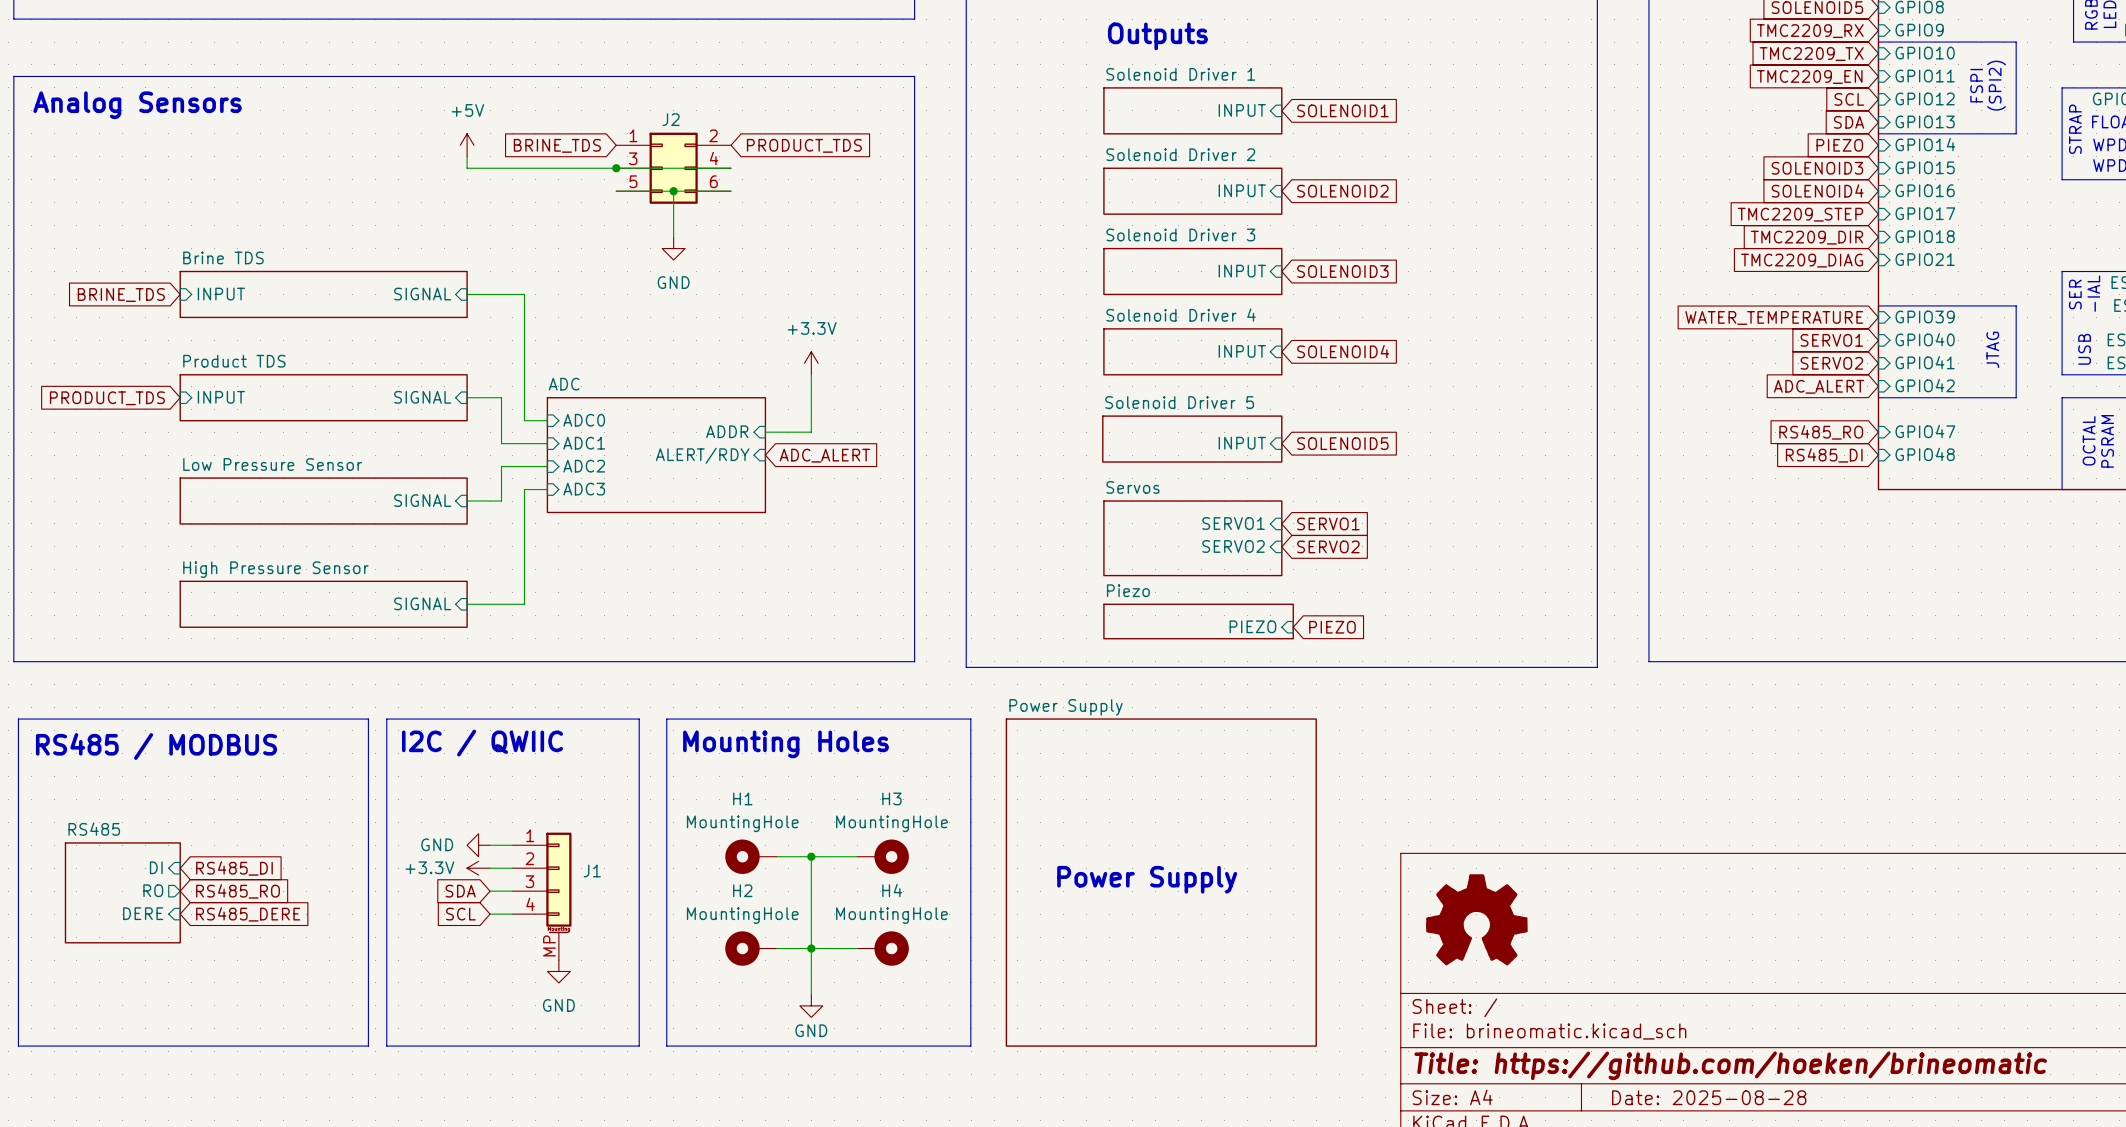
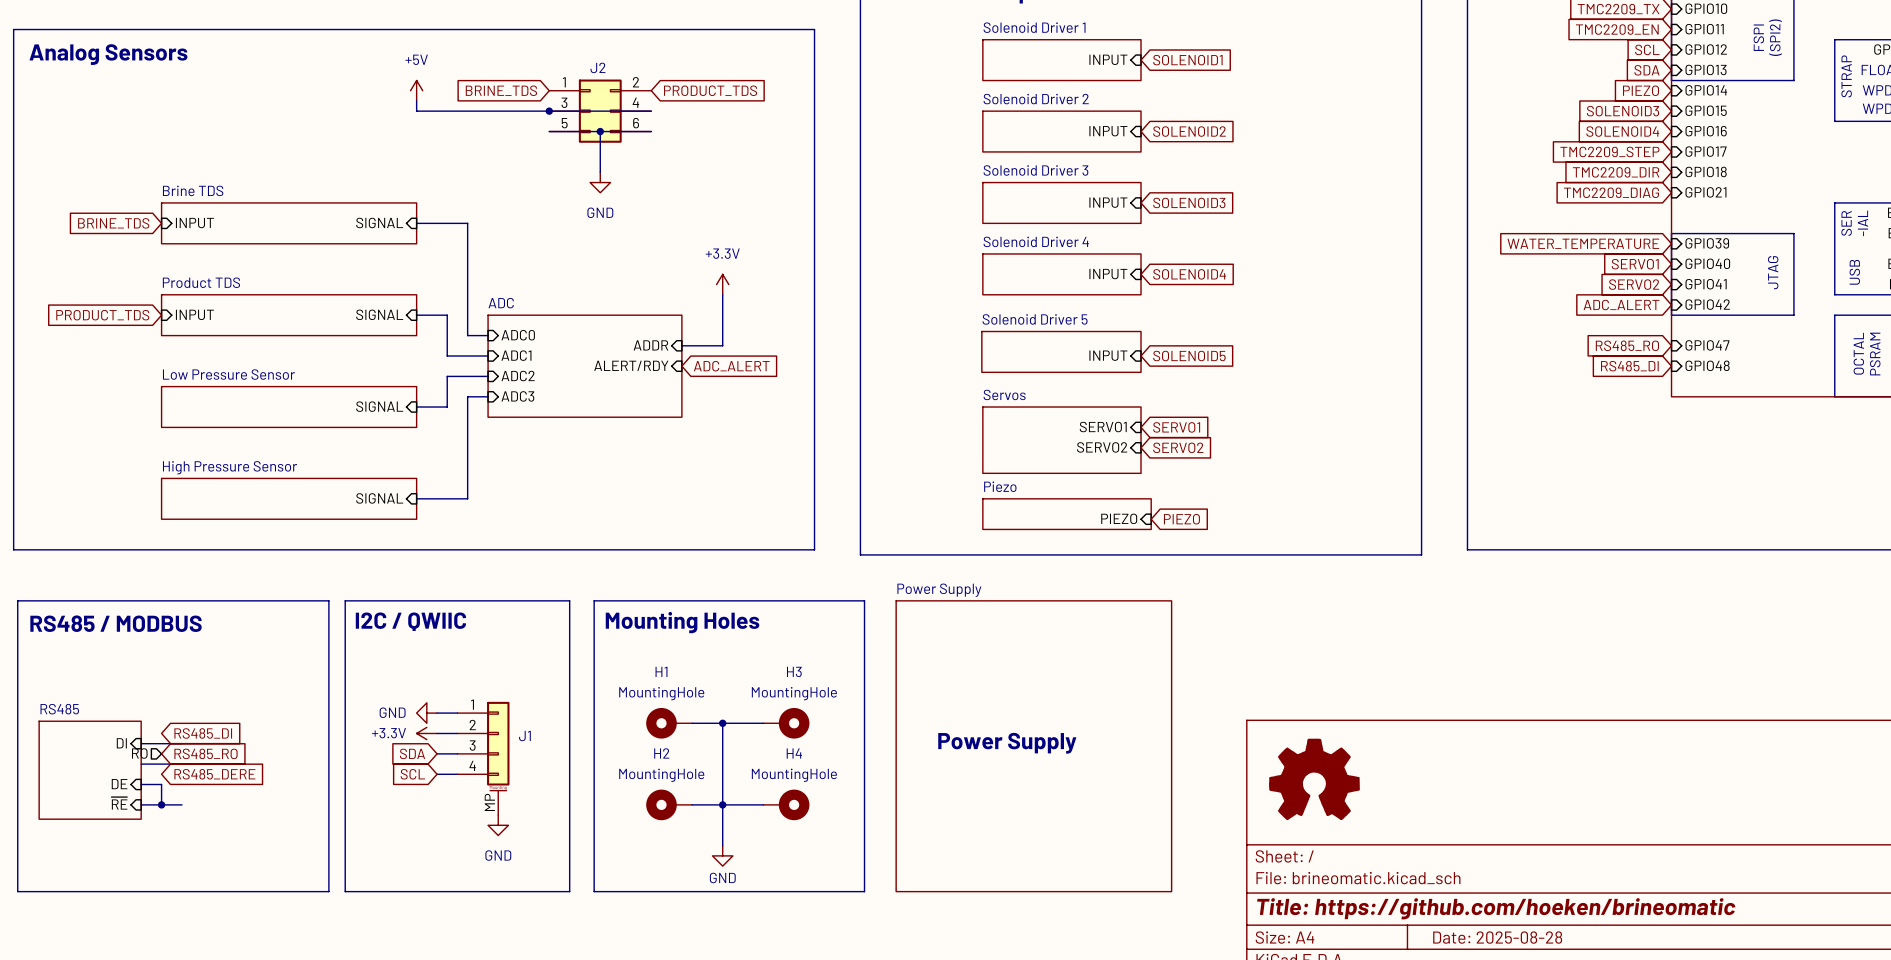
sheet RS485 shape: [64, 842, 181, 944] -> [38, 720, 142, 820]
sheet pin position: DI (156, 867) -> DI (121, 743)
wire: none -> (141, 743) (181, 743)
wire: none -> (141, 764) (181, 764)
sheet pin: DERE (143, 913) -> DE (119, 784)
wire: none -> (141, 784) (161, 784) (161, 804)
sheet pin: none -> ~{RE} (119, 803)
wire: none -> (141, 804) (181, 804)
junction: none -> (161, 804)

